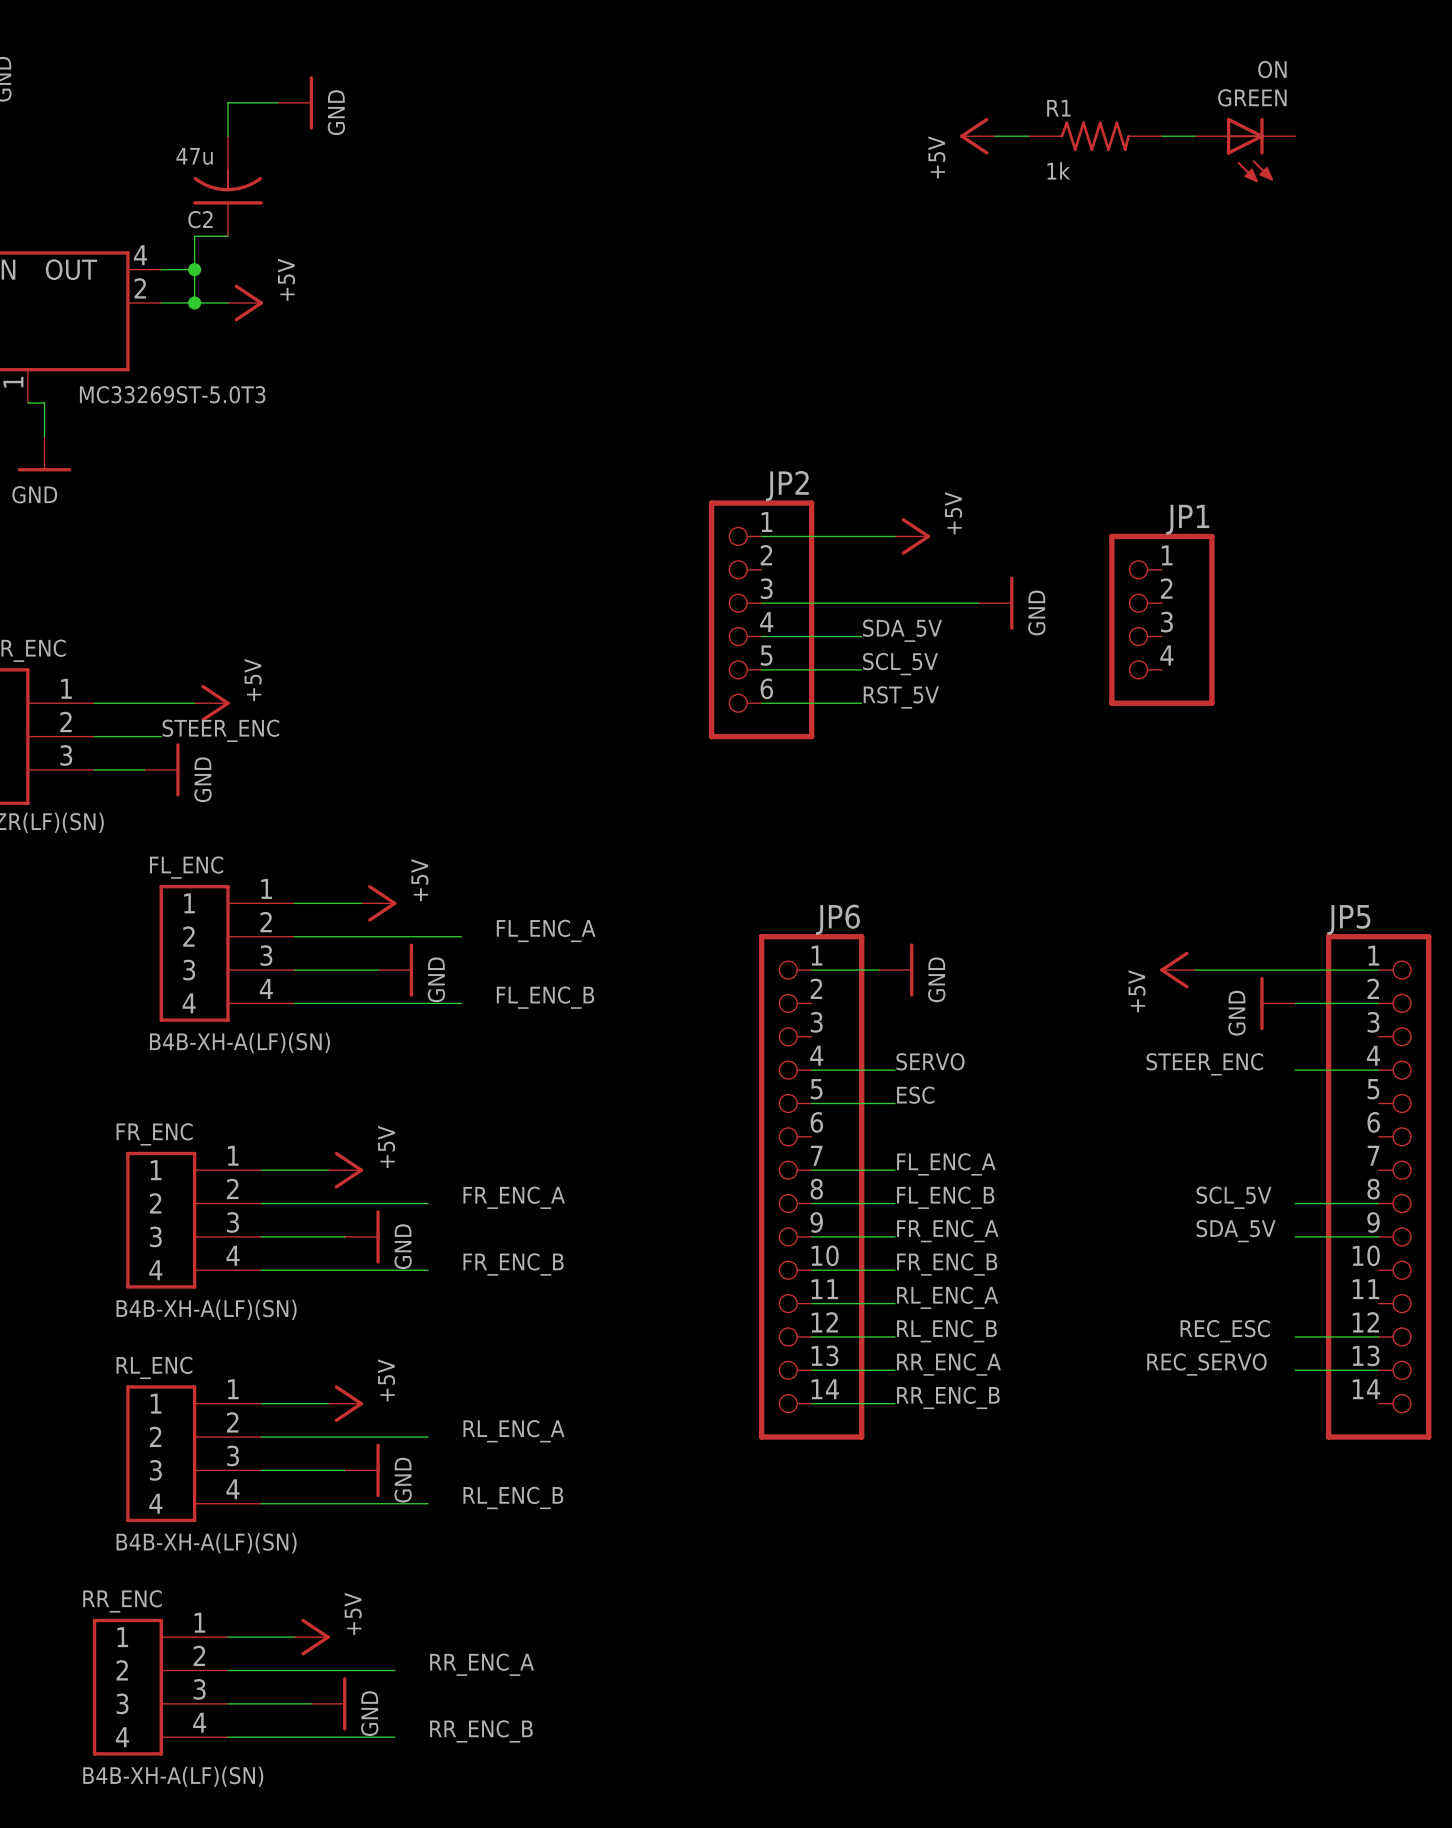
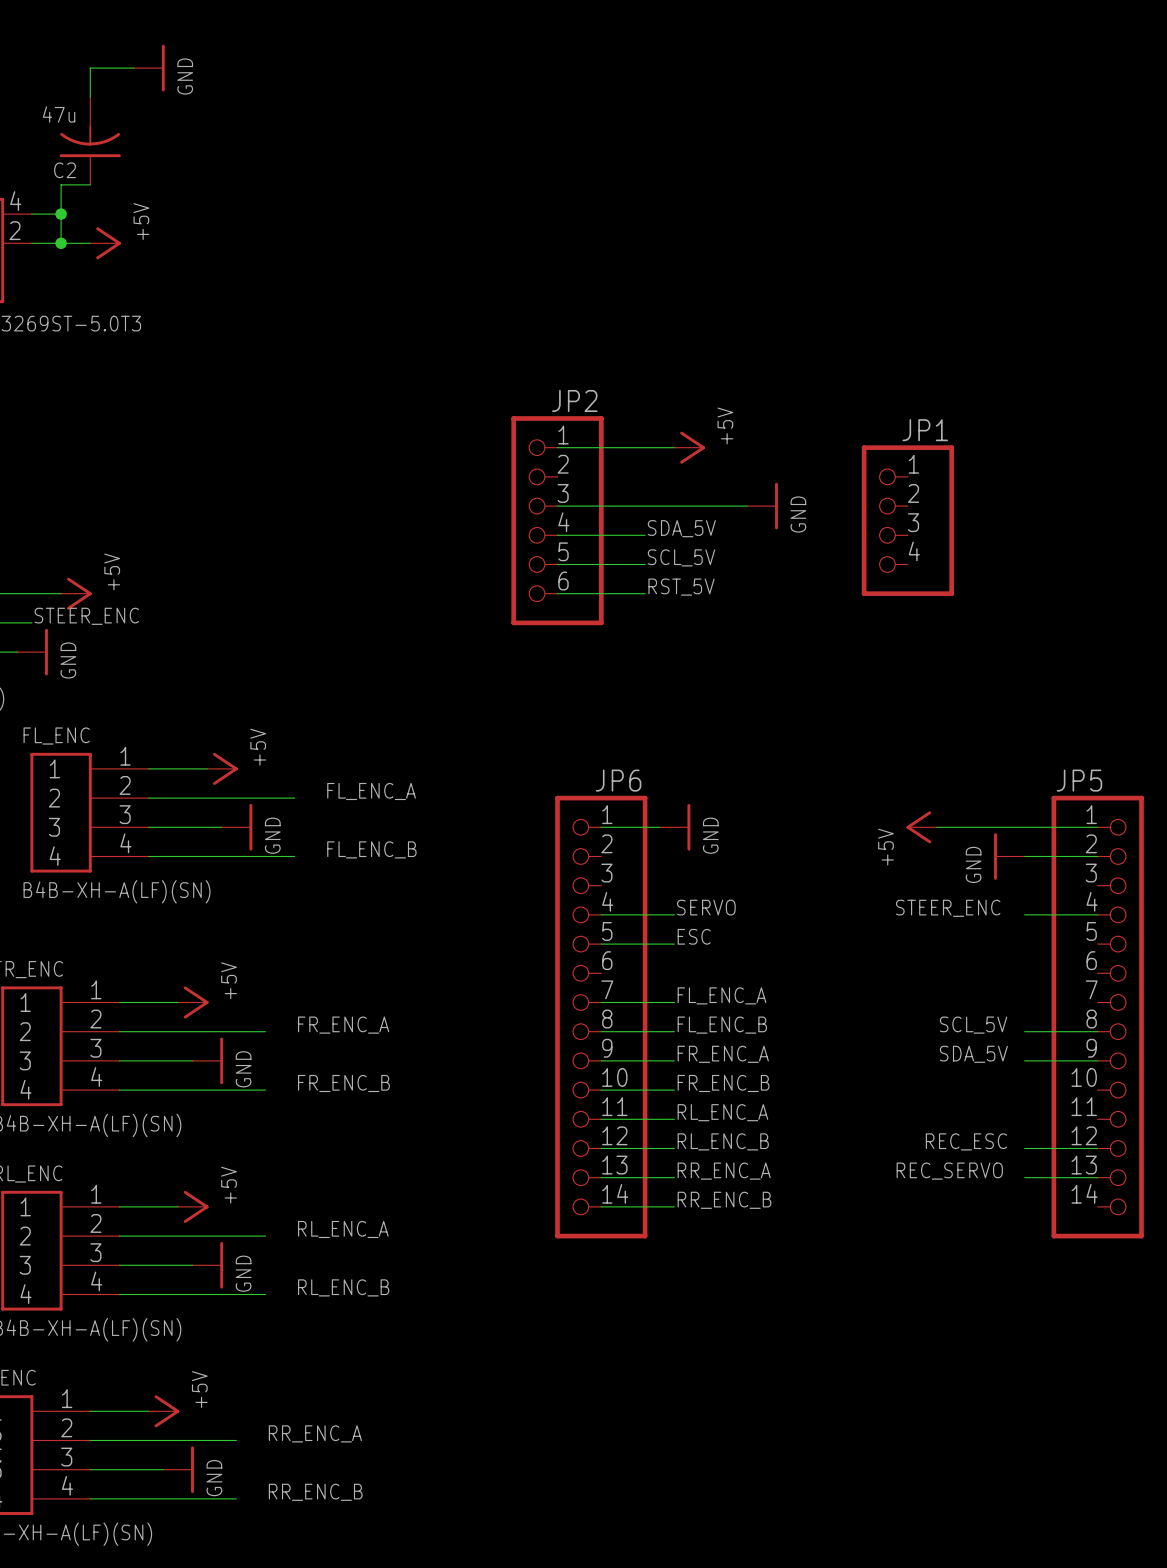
power symbol: +5V (977, 136) -> none
wire: (995, 136) (1028, 136) -> none
R1: 1k (1095, 136) -> none
wire: (1161, 136) (1195, 136) -> none
GREEN: ON (1245, 150) -> none

